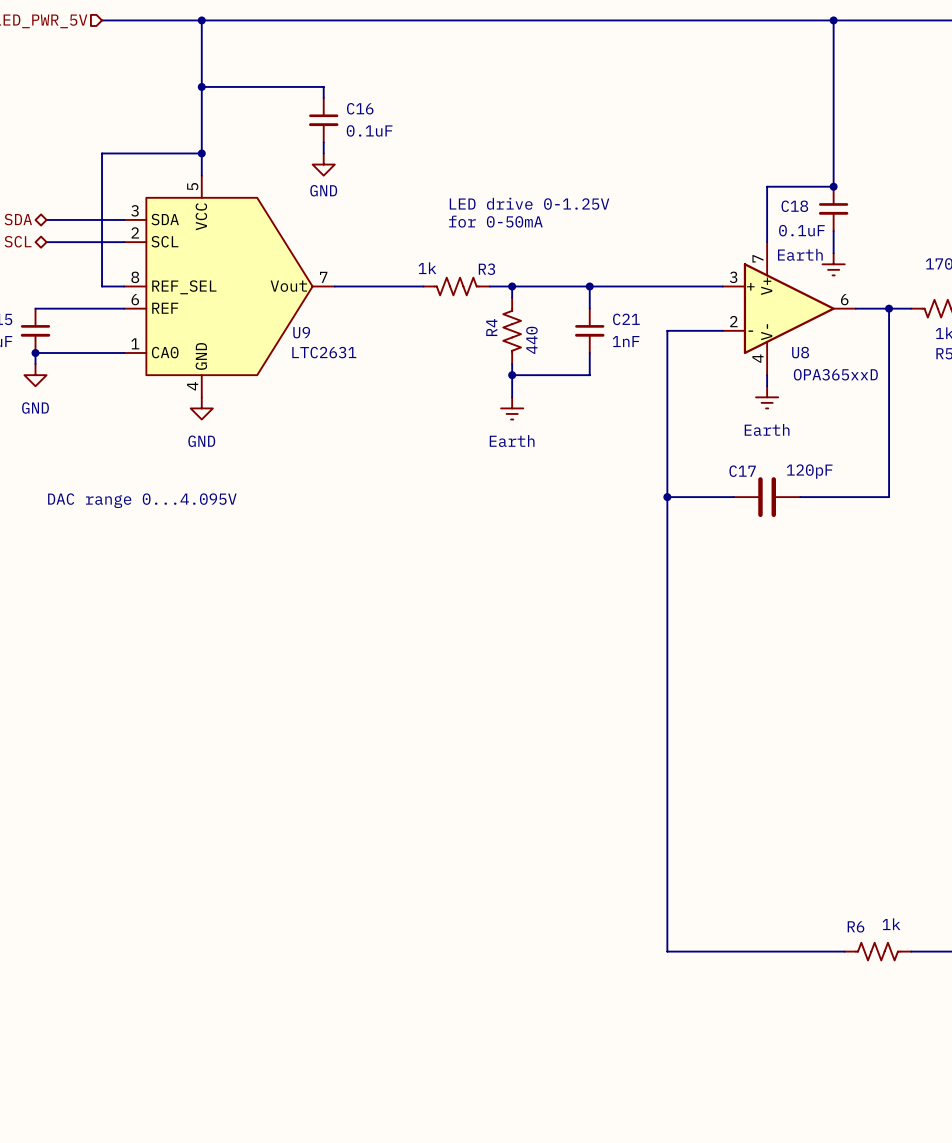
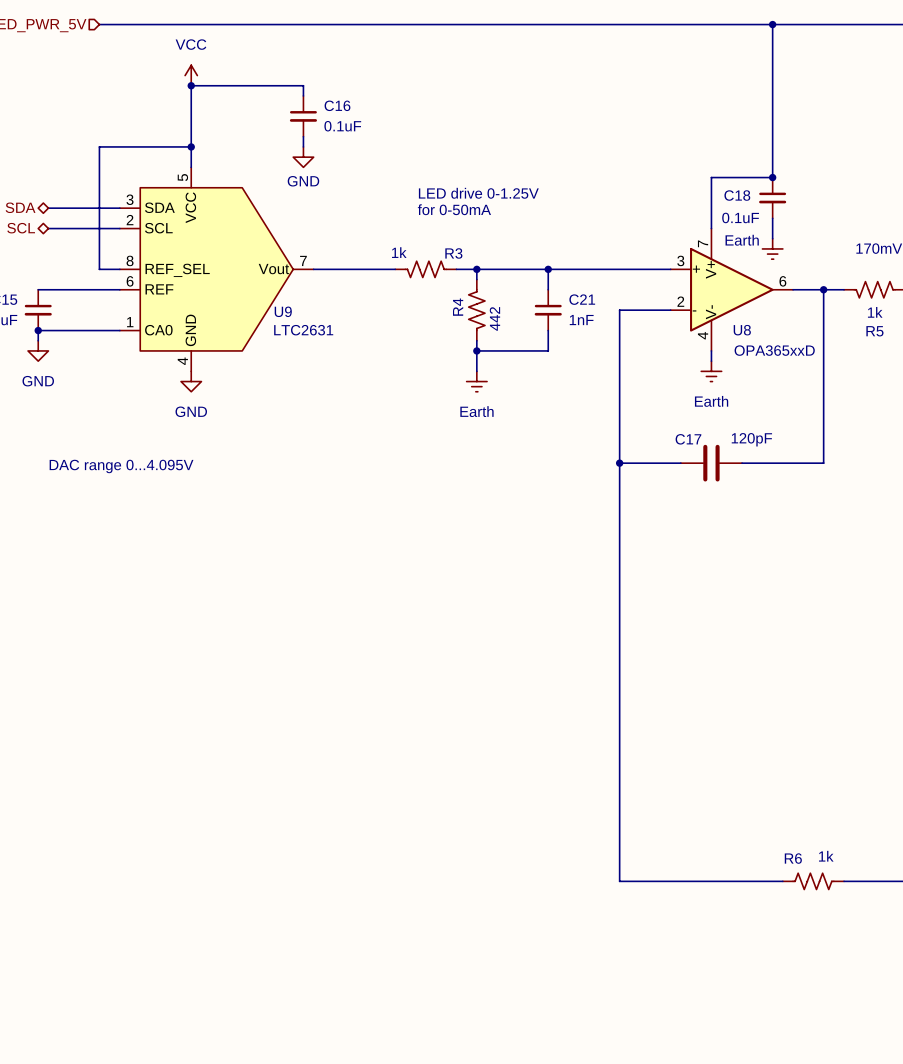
wire: (201, 20) (201, 86) -> none
junction: (201, 20) -> none
power symbol: none -> VCC (191, 75)
R4 value: 440 (531, 340) -> 442 (494, 318)

